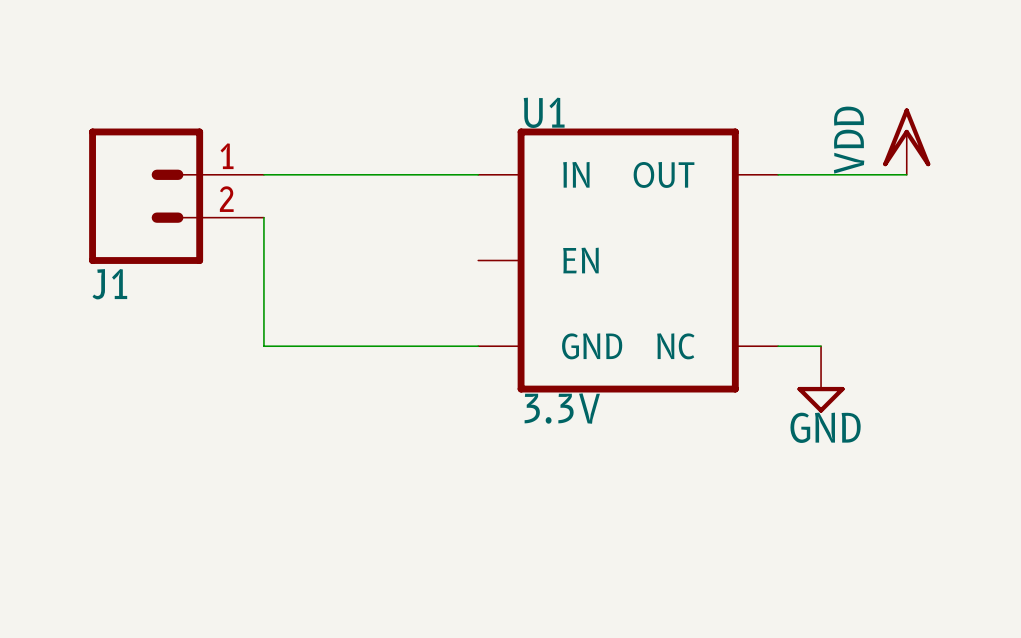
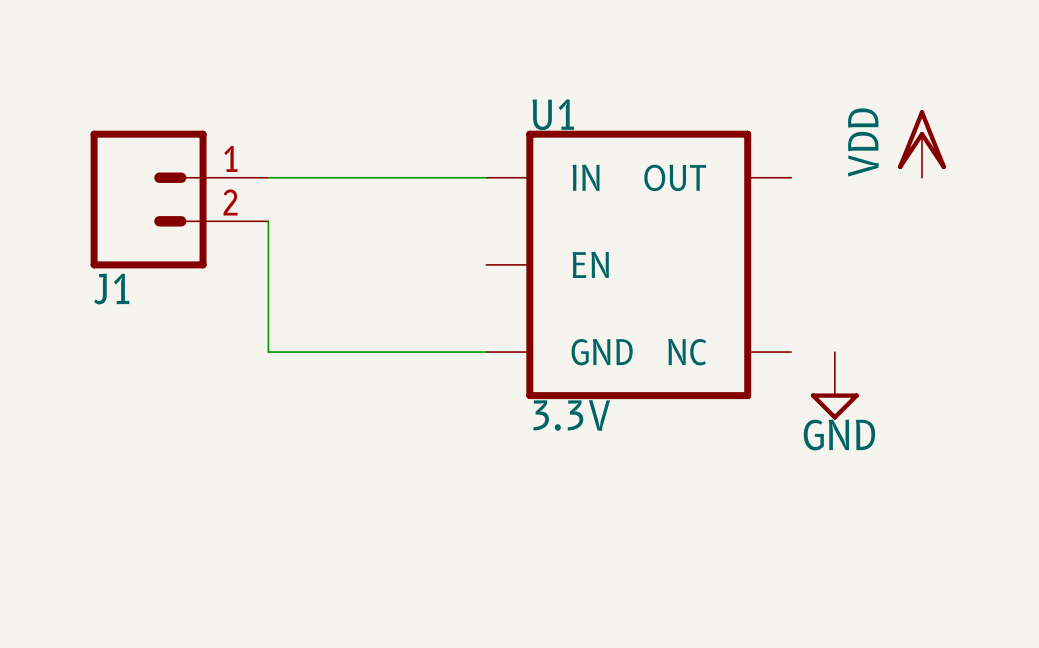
wire: (778, 174) (906, 174) -> none
wire: (778, 346) (821, 346) -> none

